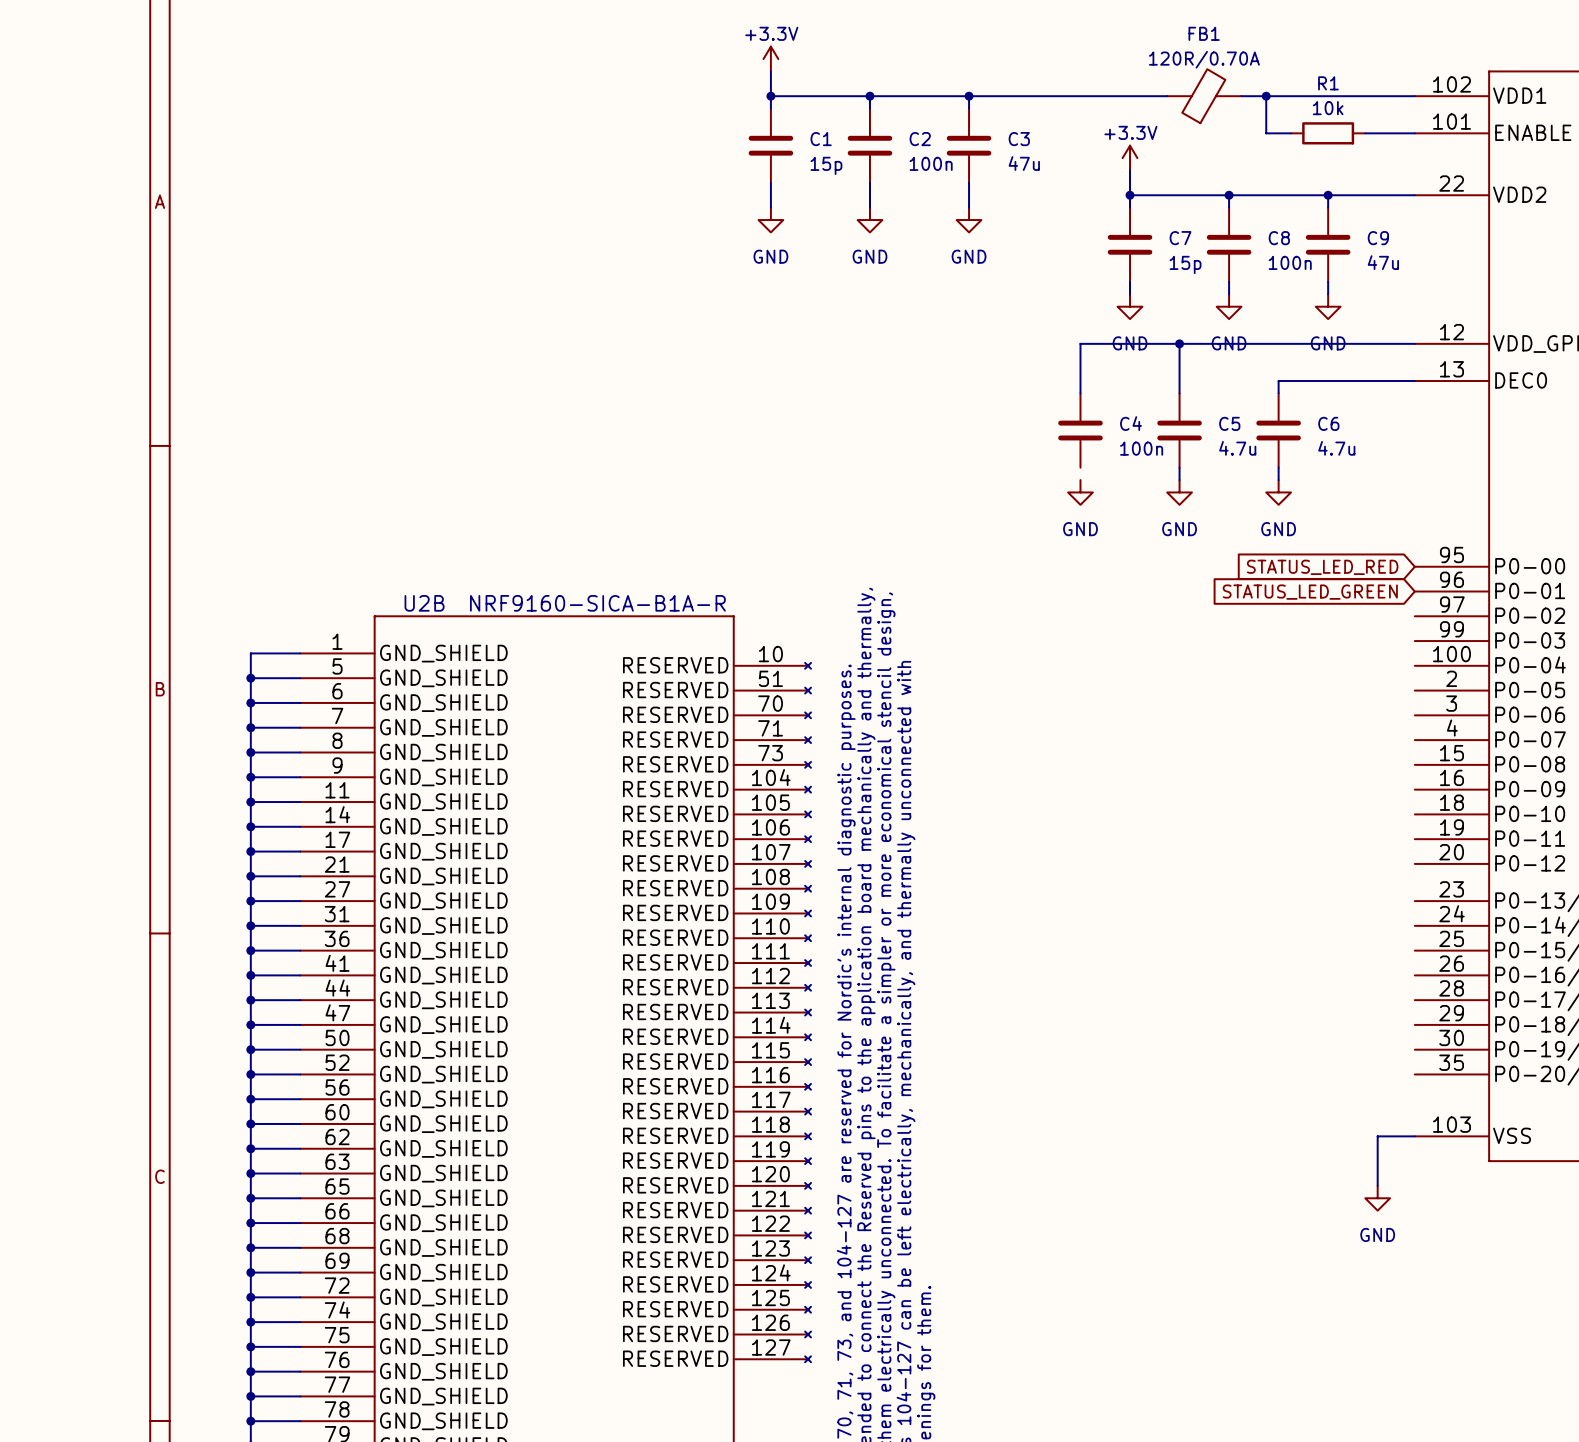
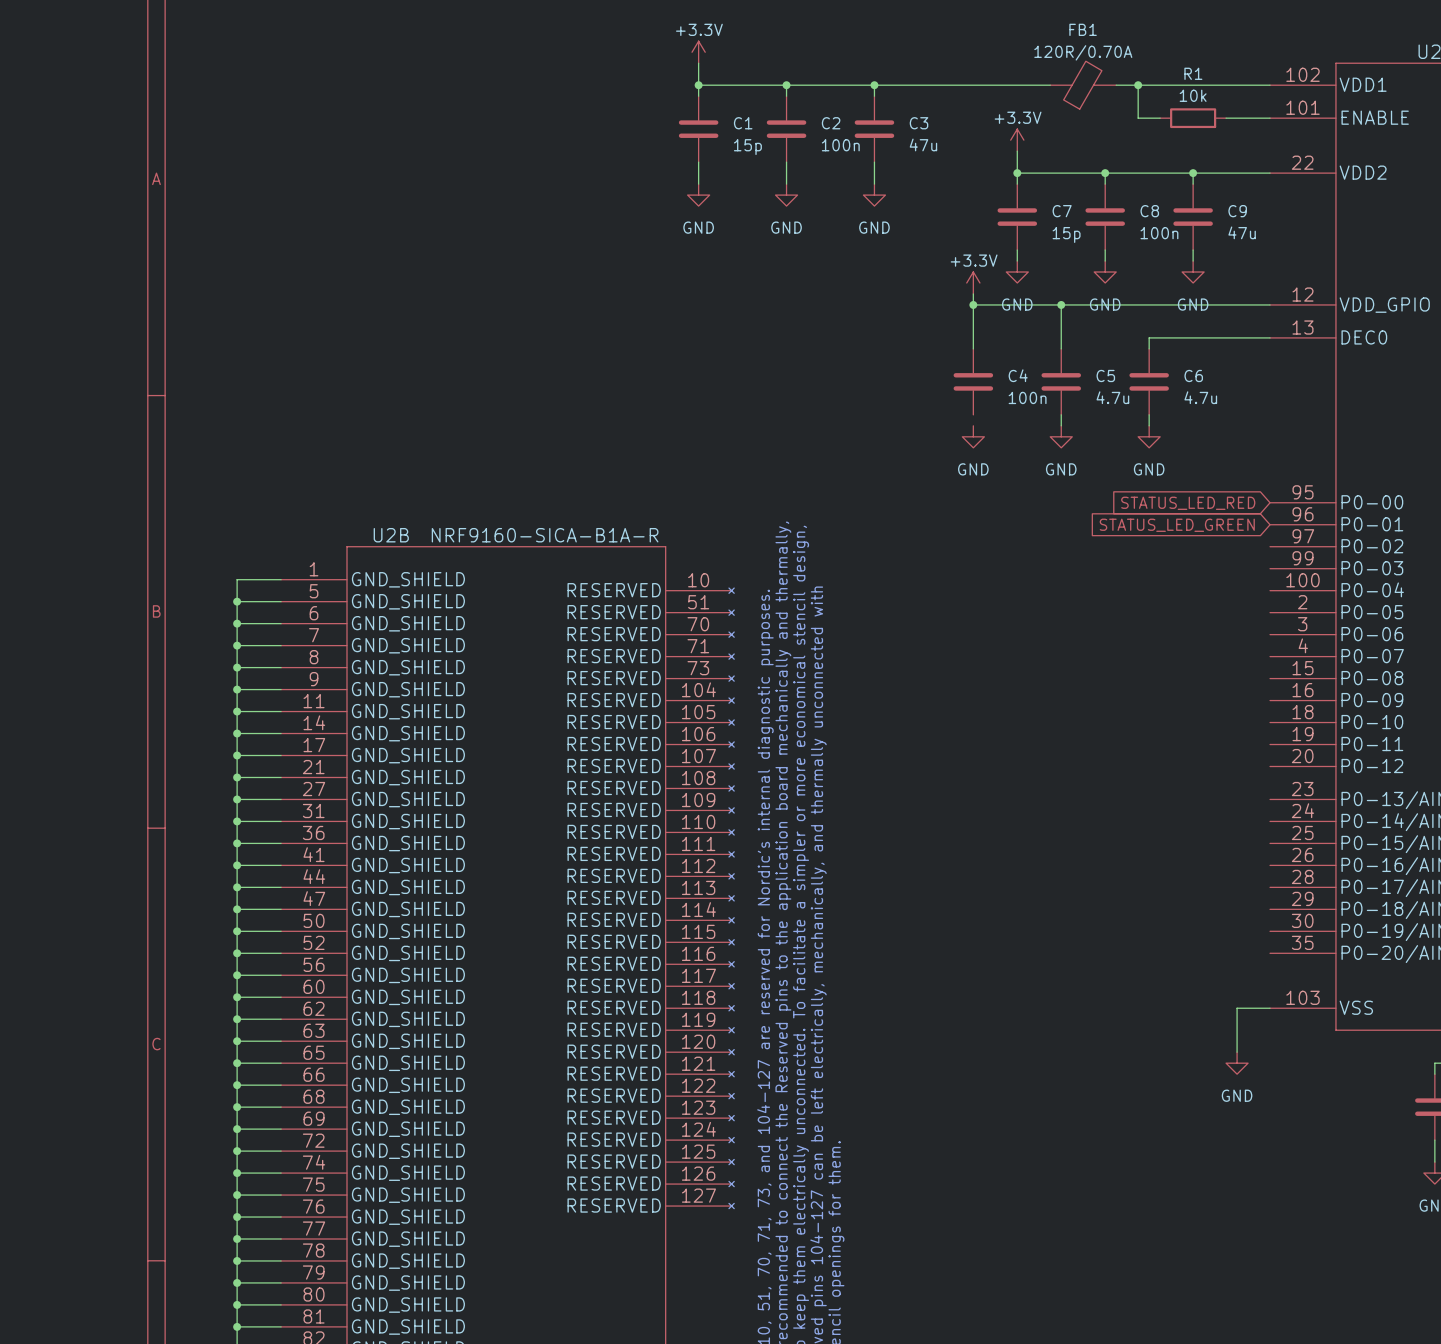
power symbol: none -> +3.3V (973, 282)
wire: none -> (973, 293) (973, 304)
junction: none -> (973, 304)

